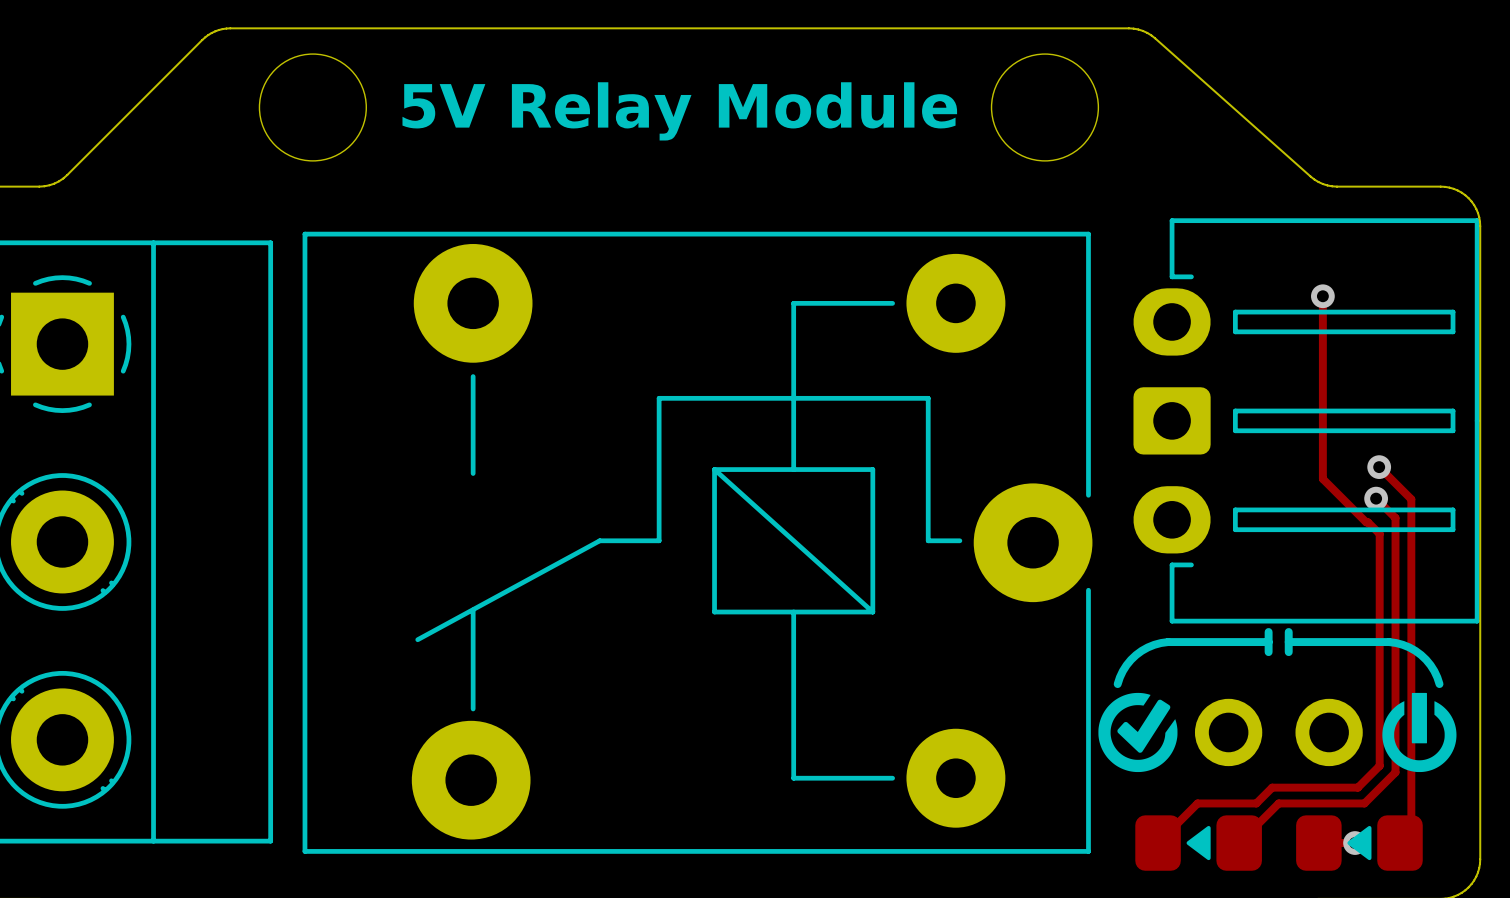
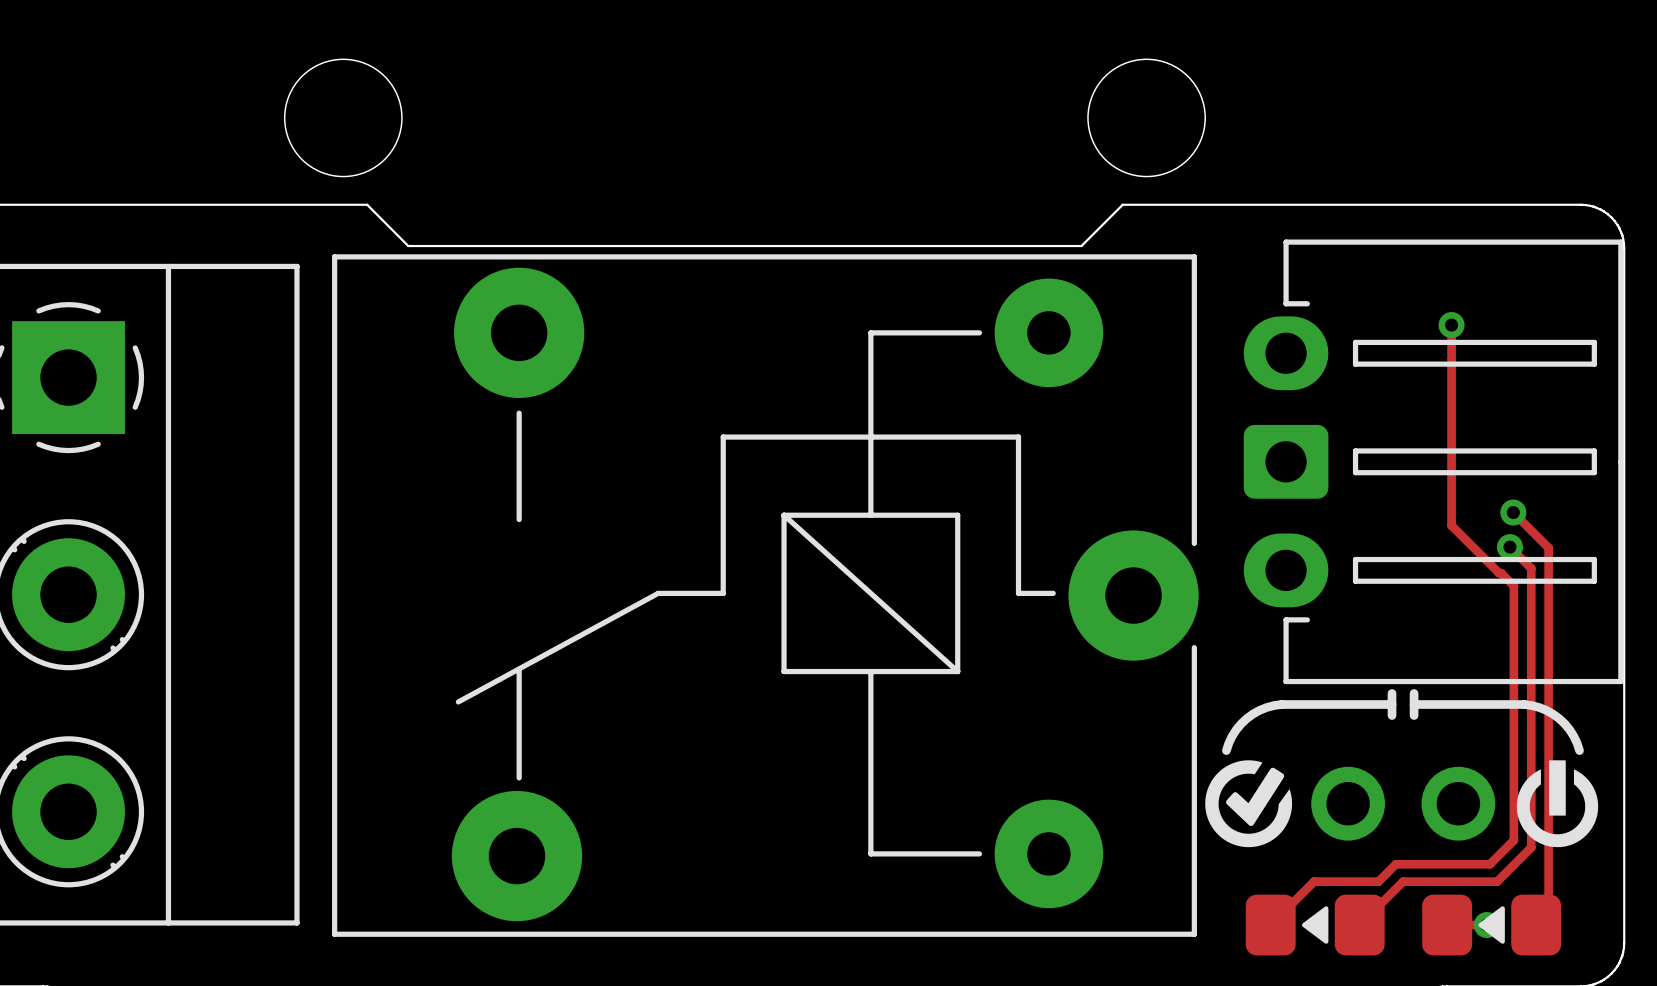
text: 5V Relay Module (679, 111) -> none
board edge: (39, 186) (54, 183) (67, 175) (205, 37) (215, 31) (230, 28) (1133, 28) (1142, 30) (1155, 38) (1314, 179) (1322, 184) (1337, 186) -> (43, 204) (367, 204) (408, 246) (1081, 246) (1122, 204) (1467, 204)

